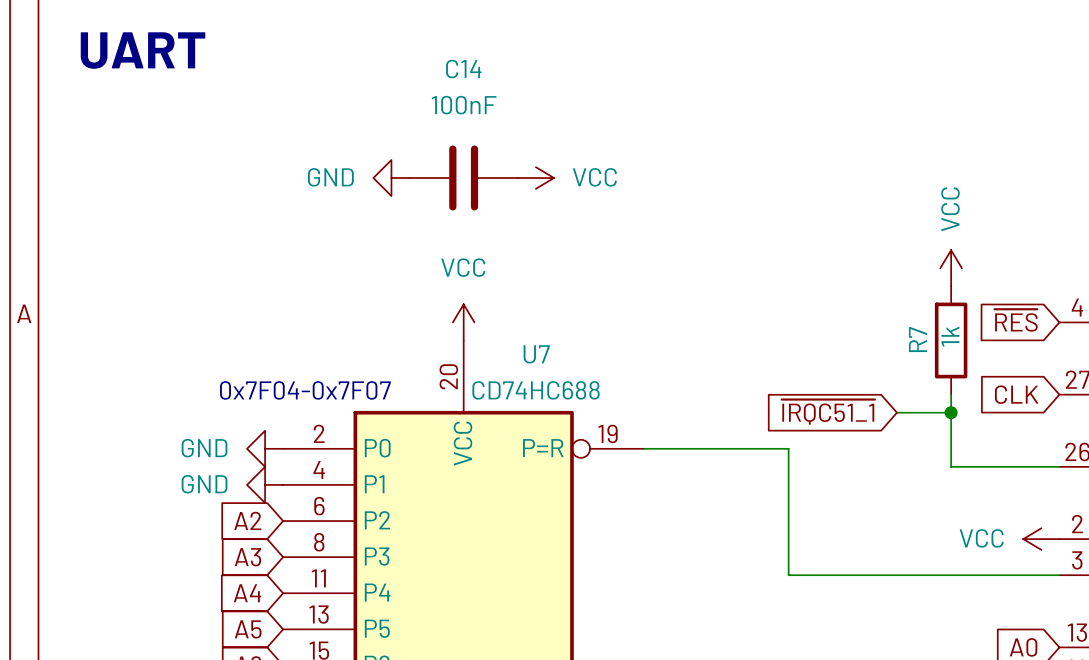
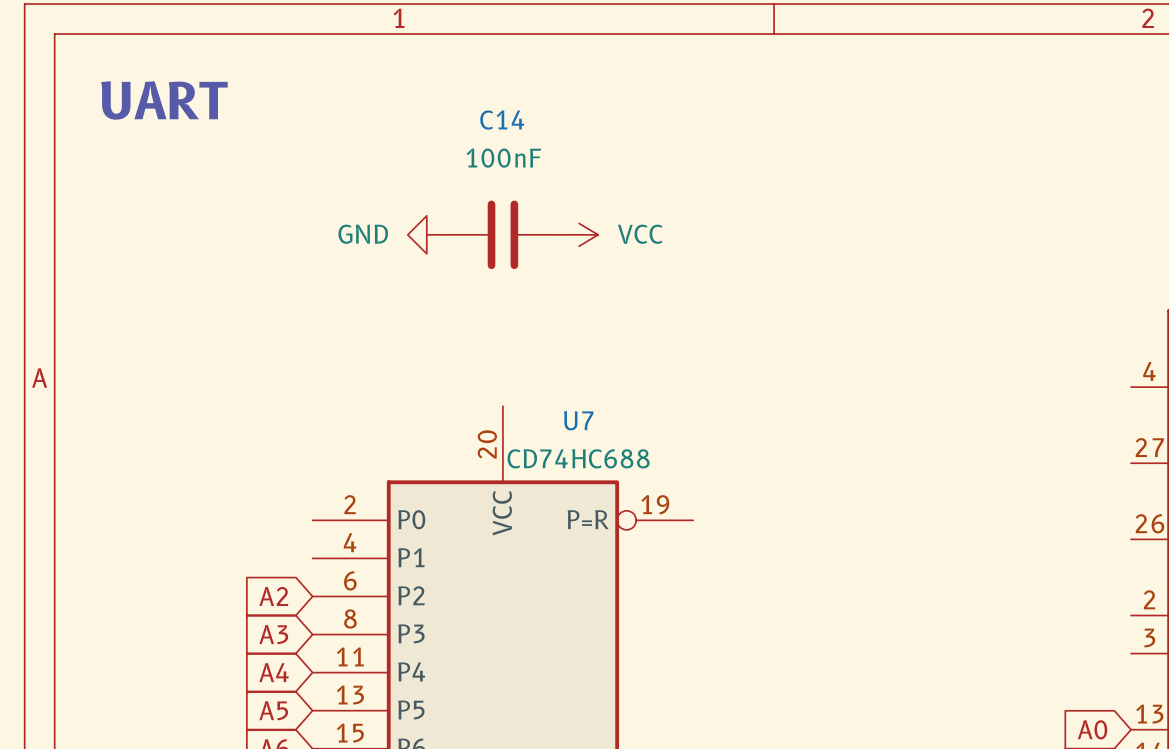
power symbol: VCC (951, 268) -> none
global label: ~{RES} (1016, 320) -> none
power symbol: VCC (463, 322) -> none
R7: 1k (951, 340) -> none
text: 0x7F04-0x7F07 (305, 390) -> none
wire: (951, 394) (951, 466) (1059, 466) -> none
global label: CLK (1016, 394) -> none
global label: ~{IRQC51_1} (828, 412) -> none
wire: (896, 412) (951, 412) -> none
junction: (951, 412) -> none
power symbol: GND (265, 448) -> none
wire: (644, 448) (788, 448) (788, 575) (1059, 575) -> none
power symbol: GND (265, 484) -> none
power symbol: VCC (1041, 539) -> none

